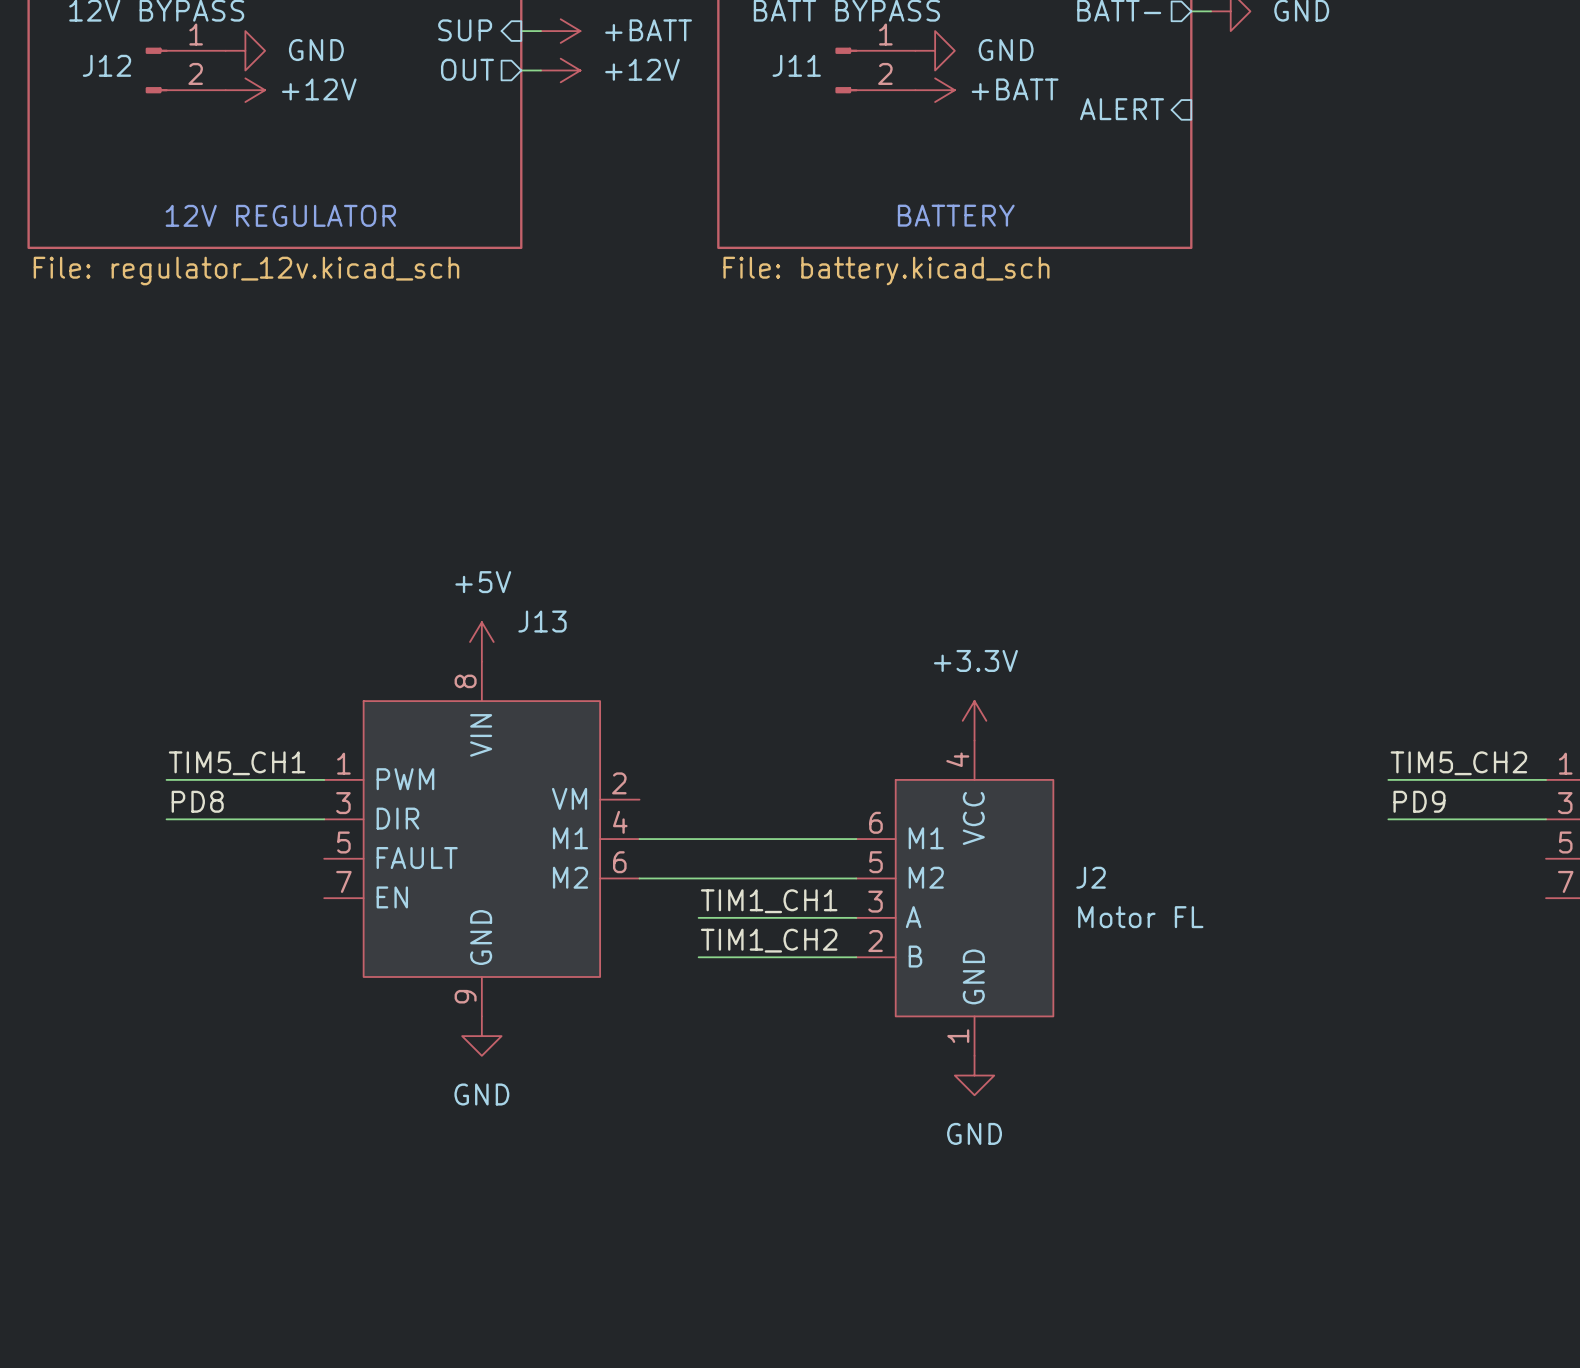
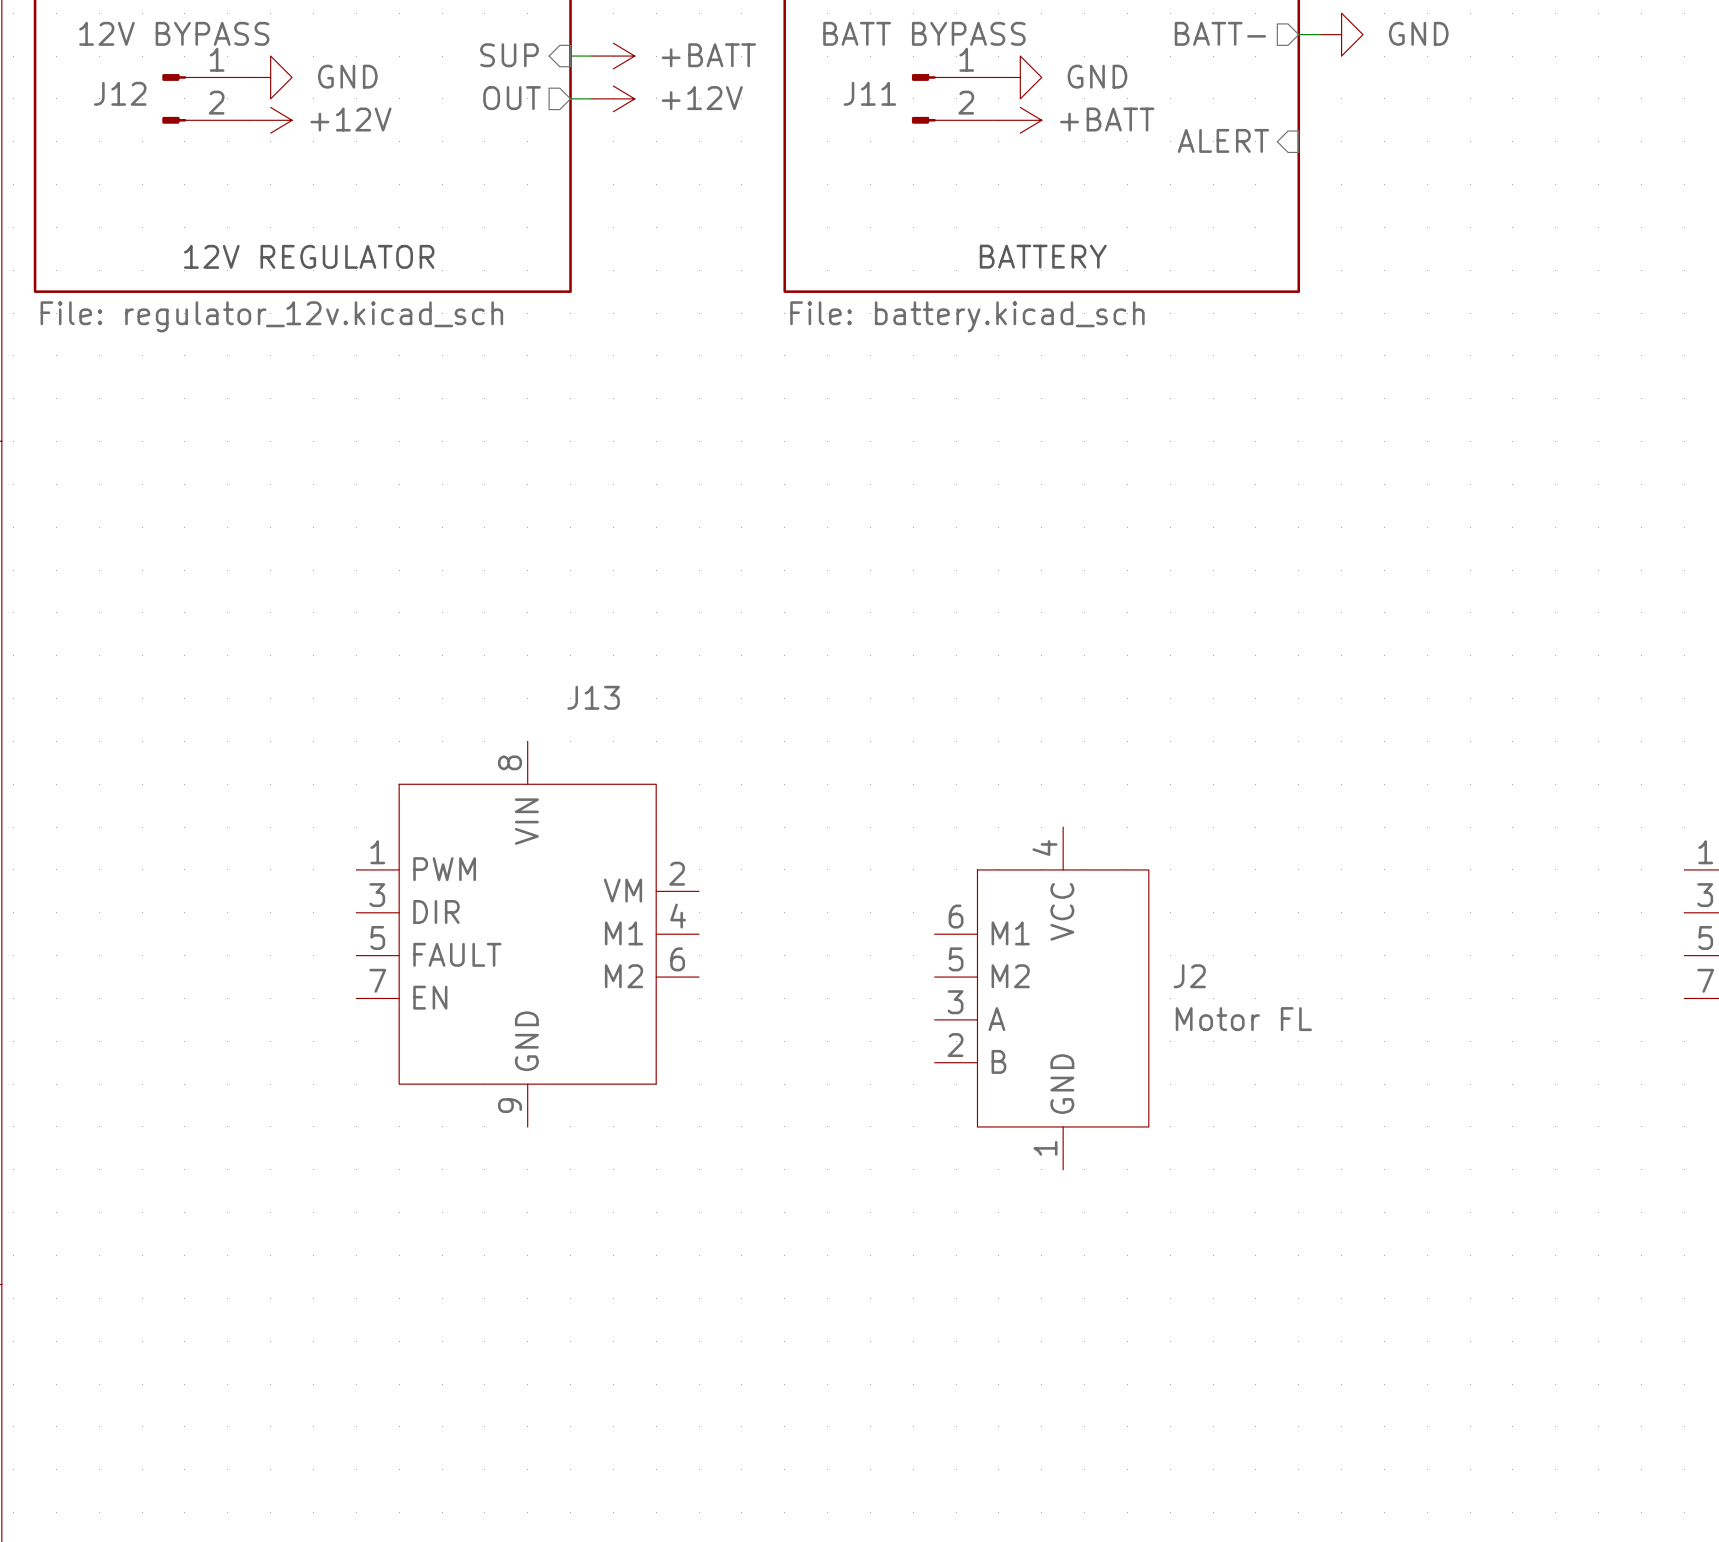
power symbol: +5V (481, 641) -> none
power symbol: +3.3V (974, 720) -> none
label: TIM5_CH1 (237, 763) -> none
label: TIM5_CH2 (1458, 763) -> none
wire: (166, 779) (324, 779) -> none
wire: (1388, 779) (1546, 779) -> none
label: PD8 (197, 801) -> none
label: PD9 (1419, 801) -> none
wire: (166, 819) (324, 819) -> none
wire: (1388, 819) (1546, 819) -> none
wire: (639, 839) (856, 839) -> none
wire: (639, 878) (856, 878) -> none
label: TIM1_CH1 (769, 901) -> none
wire: (698, 917) (856, 917) -> none
label: TIM1_CH2 (769, 940) -> none
wire: (698, 957) (856, 957) -> none
power symbol: GND (481, 1036) -> none
power symbol: GND (974, 1075) -> none

